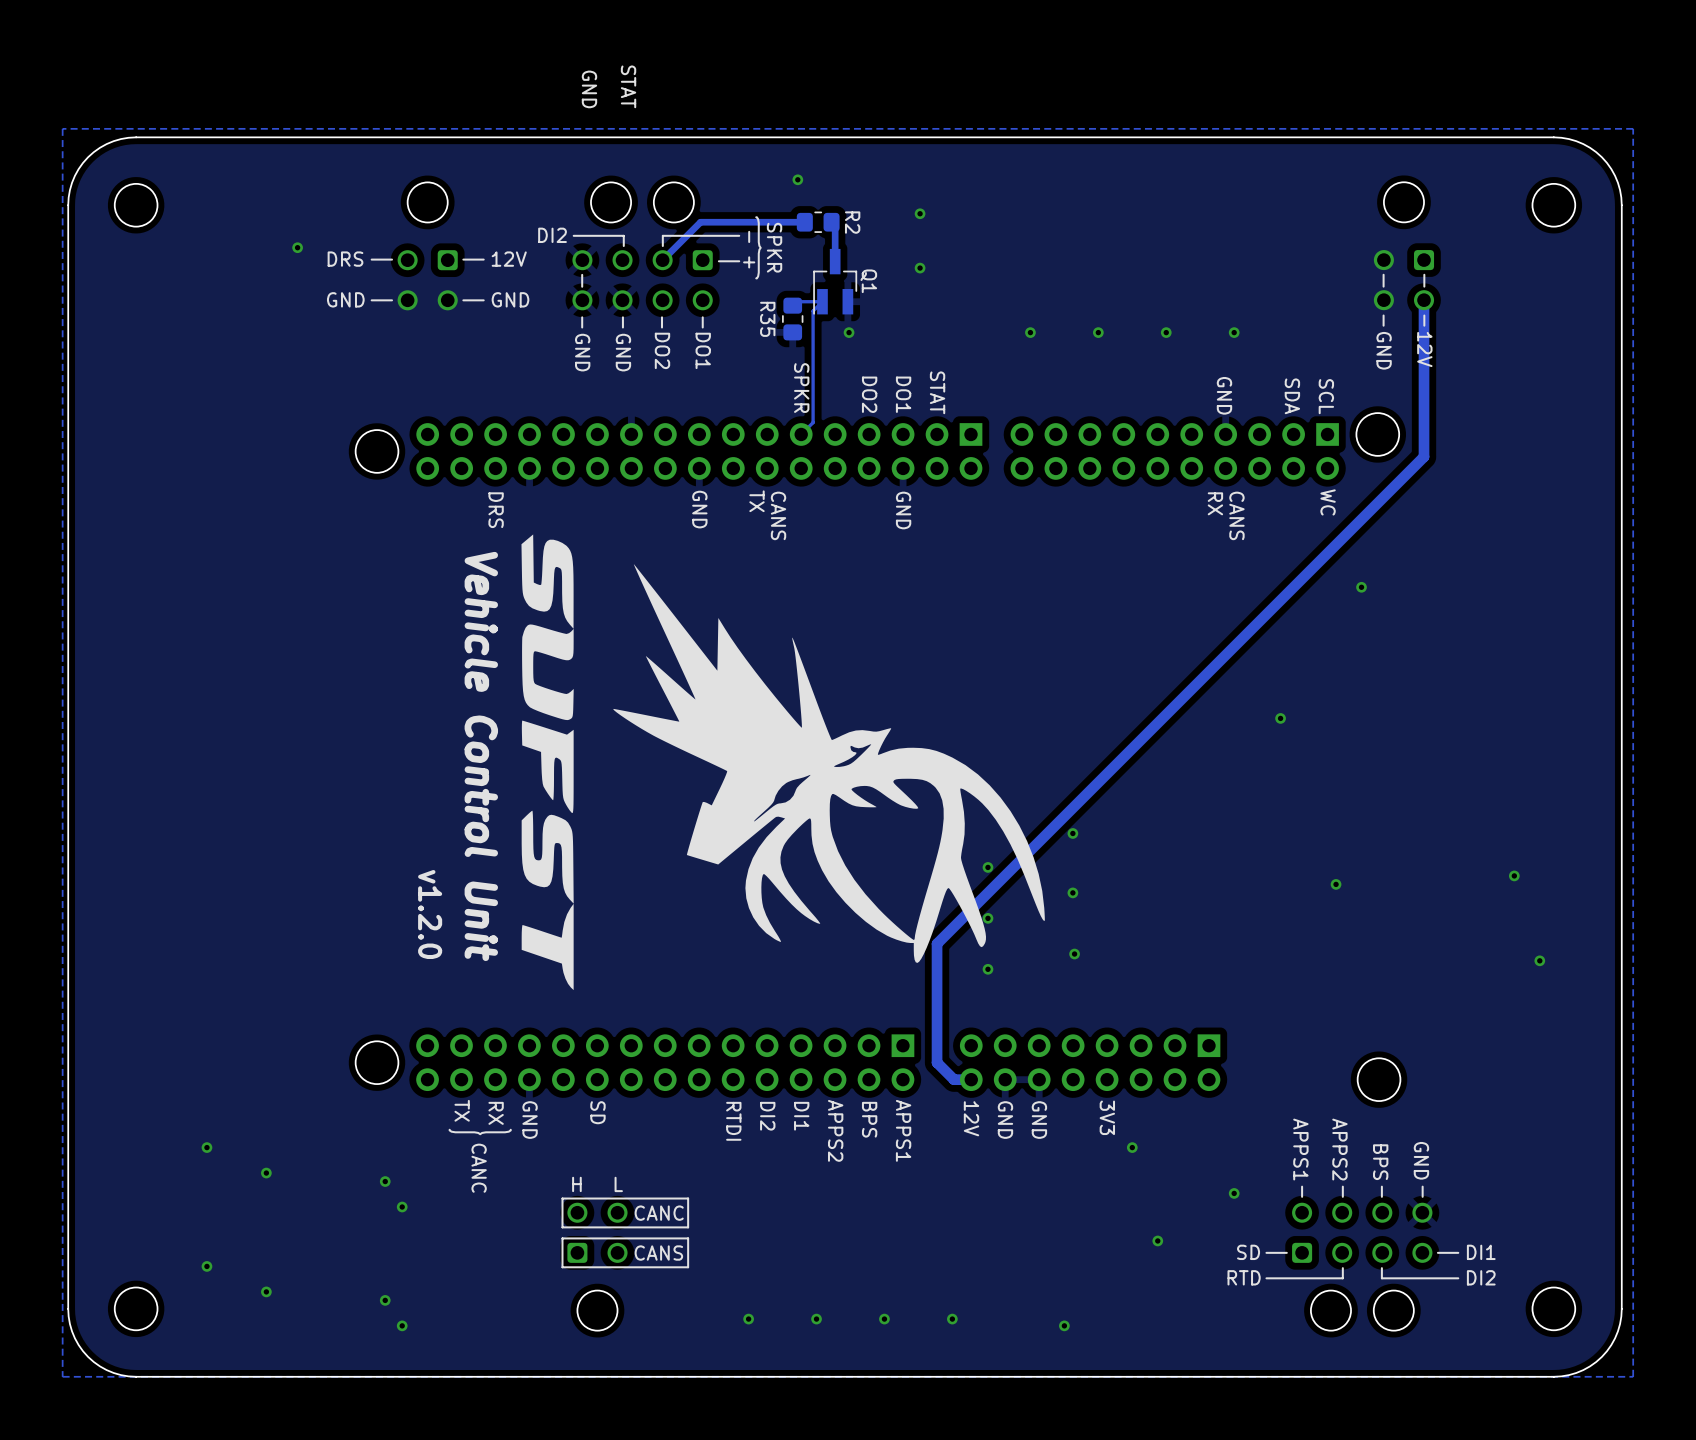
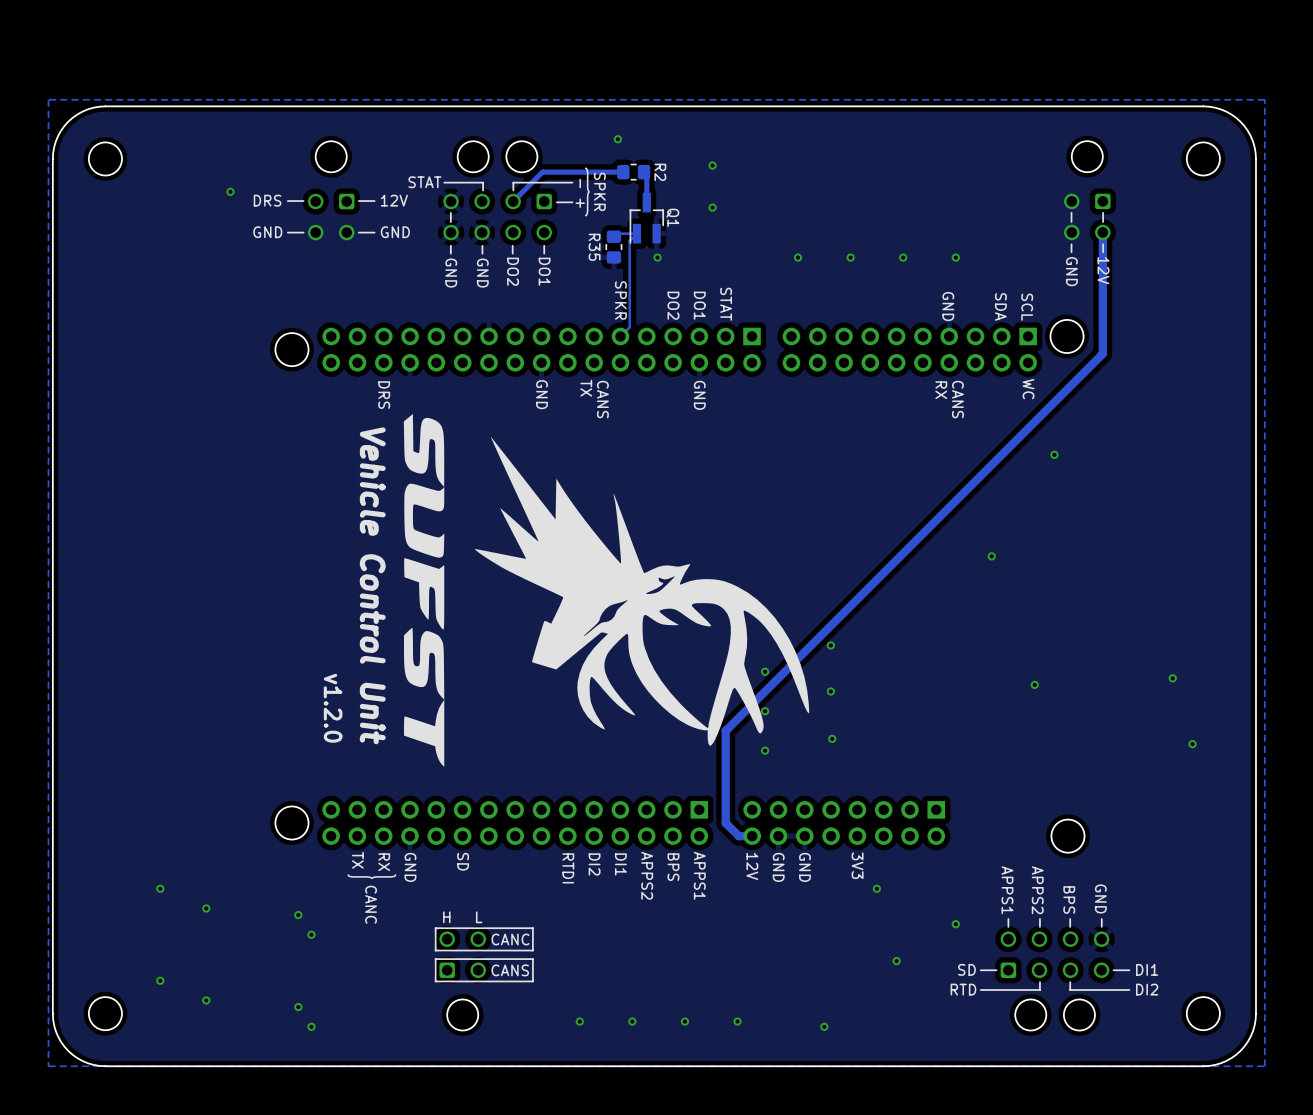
text rotation: 0° (628, 86) -> 90° counterclockwise (424, 182)
text position: STAT (628, 86) -> STAT (424, 182)
text: GND (589, 89) -> none
text: DI2 (552, 235) -> none

